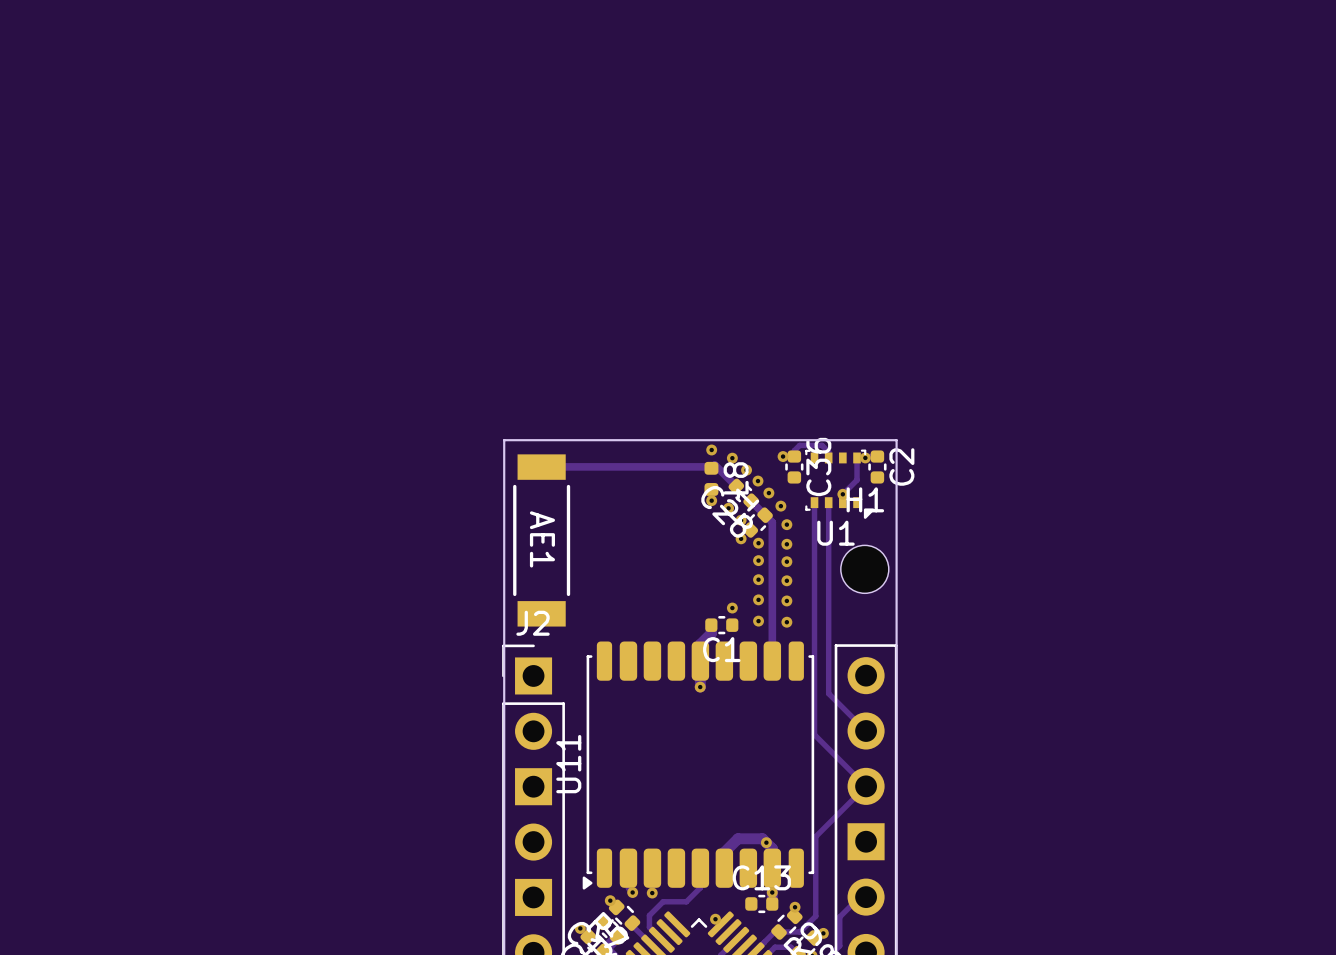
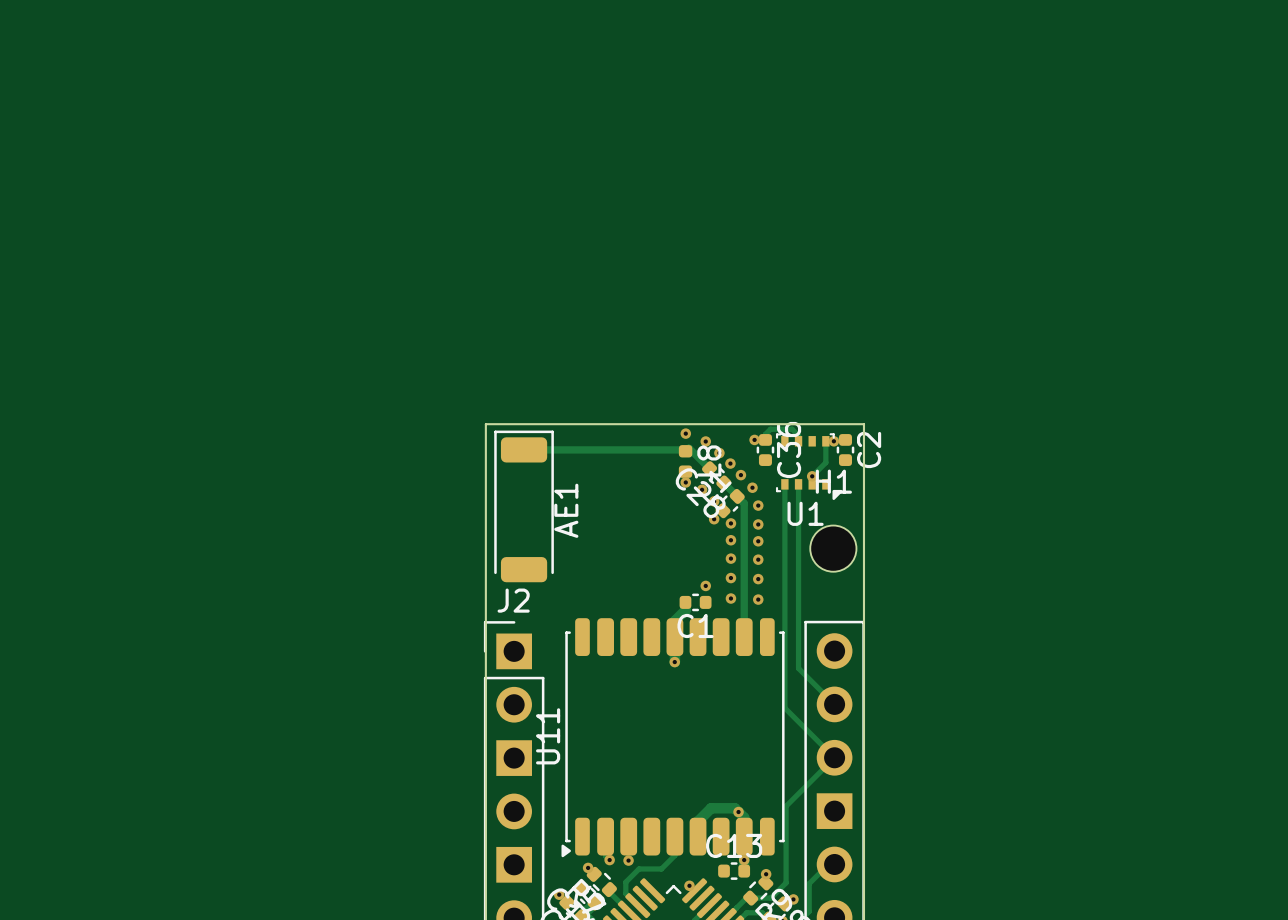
AE1 footprint: [513, 454, 571, 627] -> [494, 430, 554, 583]
AE1 name position: AE1 (542, 539) -> AE1 (566, 510)

